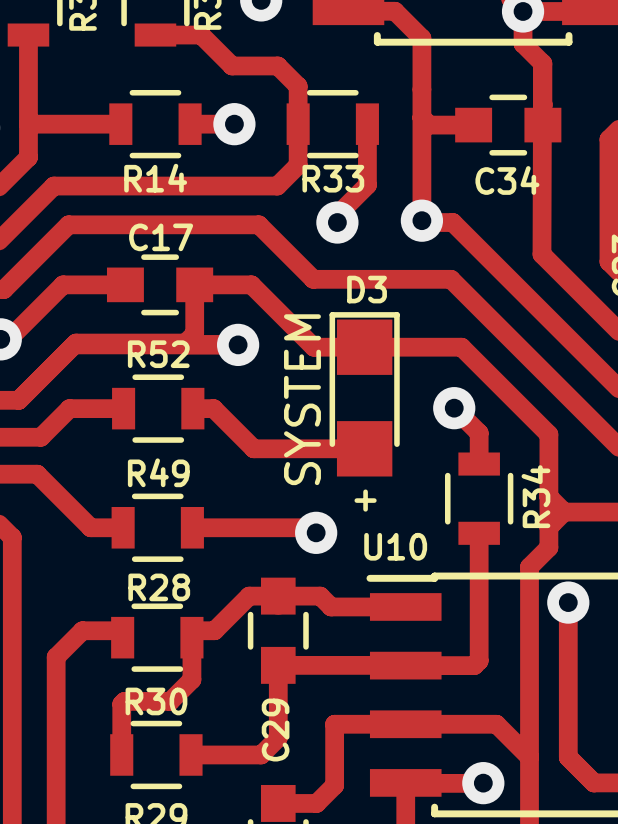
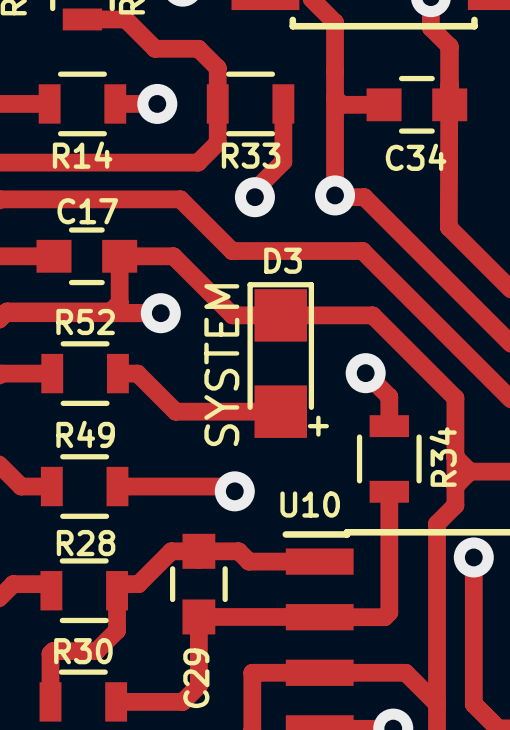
text position: + (365, 500) -> + (318, 426)

